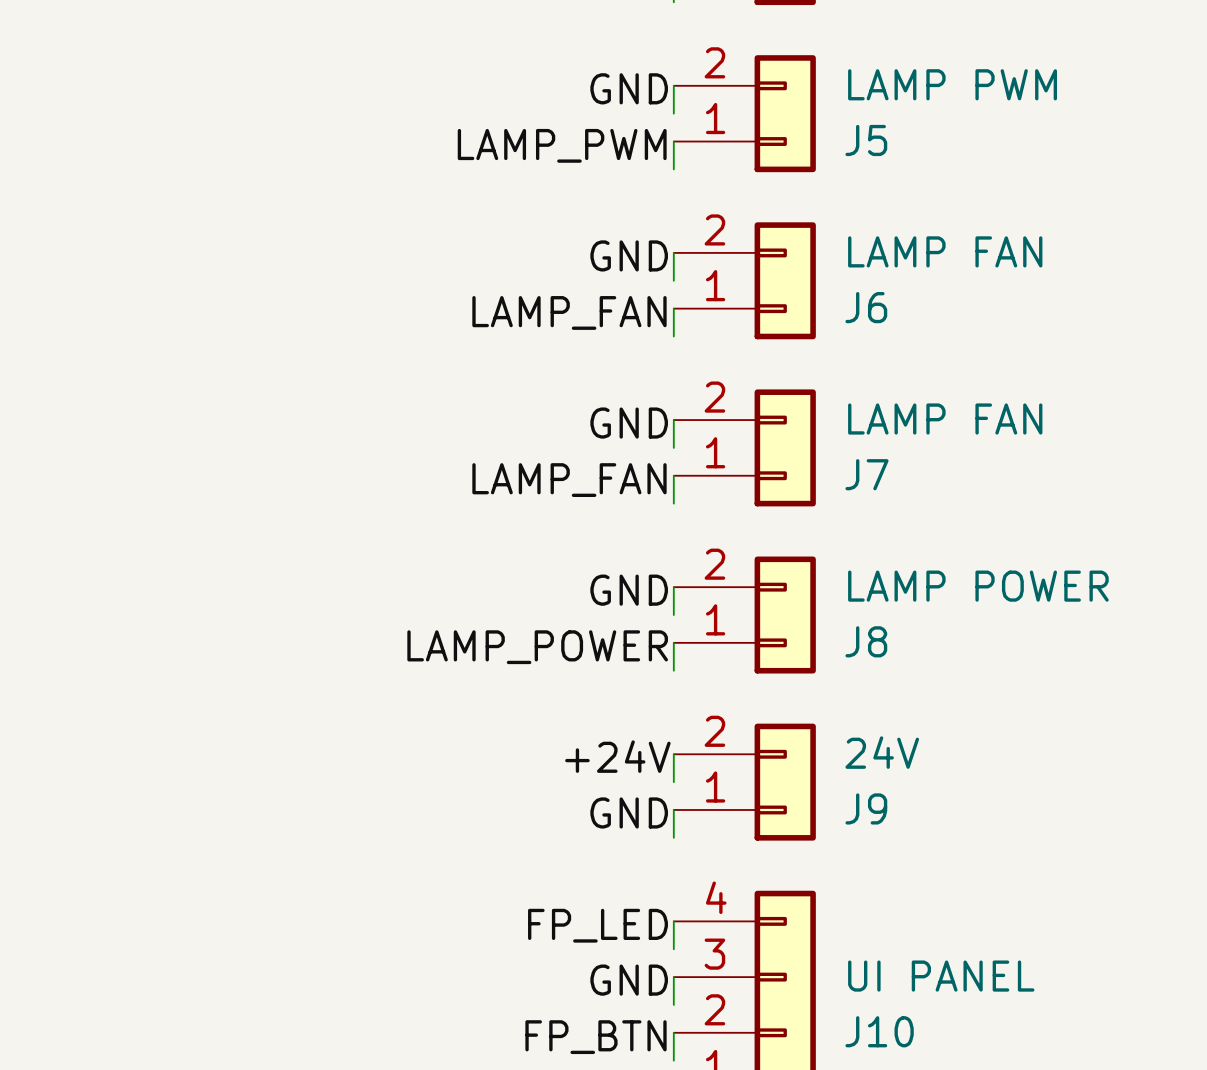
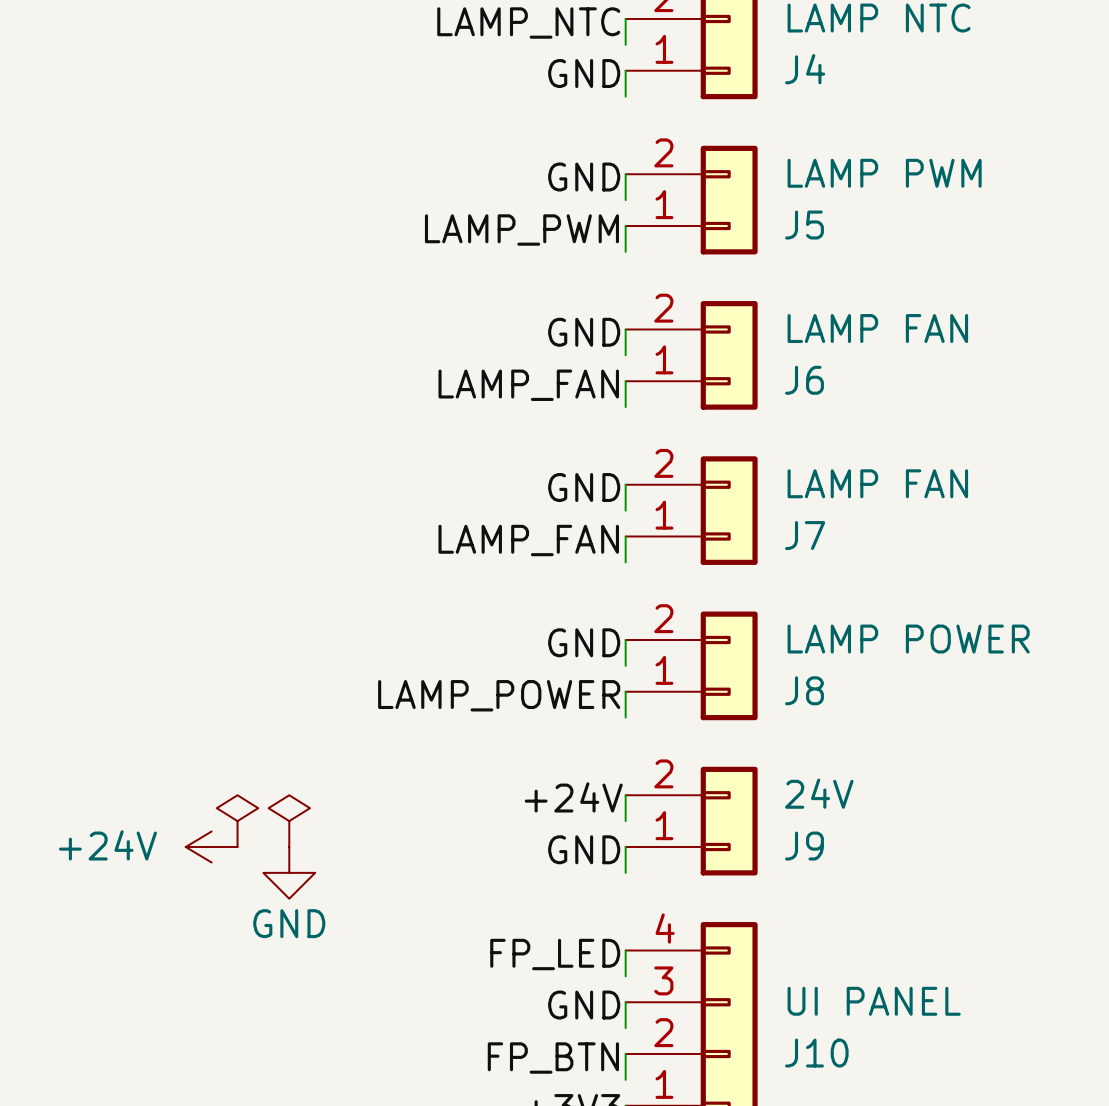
power symbol: none -> (237, 821)
power symbol: none -> (289, 821)
power symbol: none -> +24V (211, 847)
power symbol: none -> GND (289, 872)

